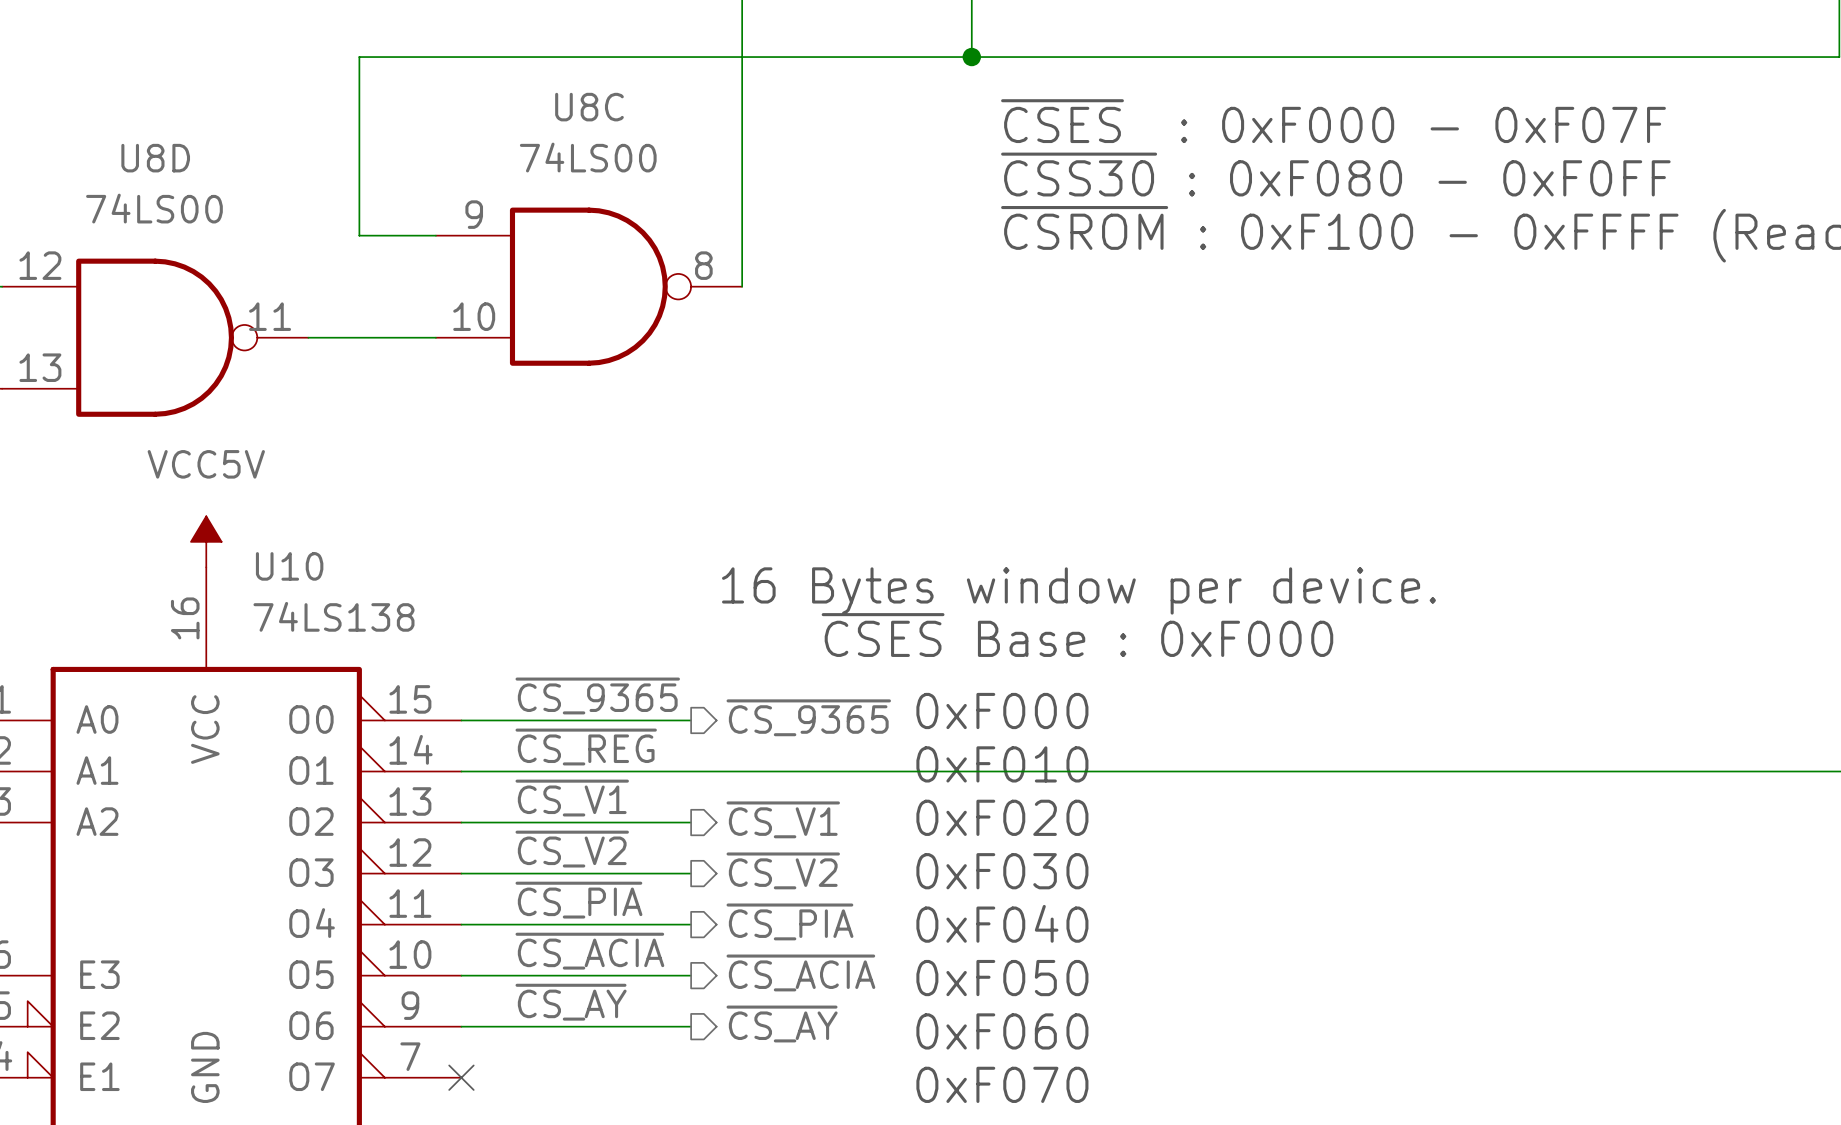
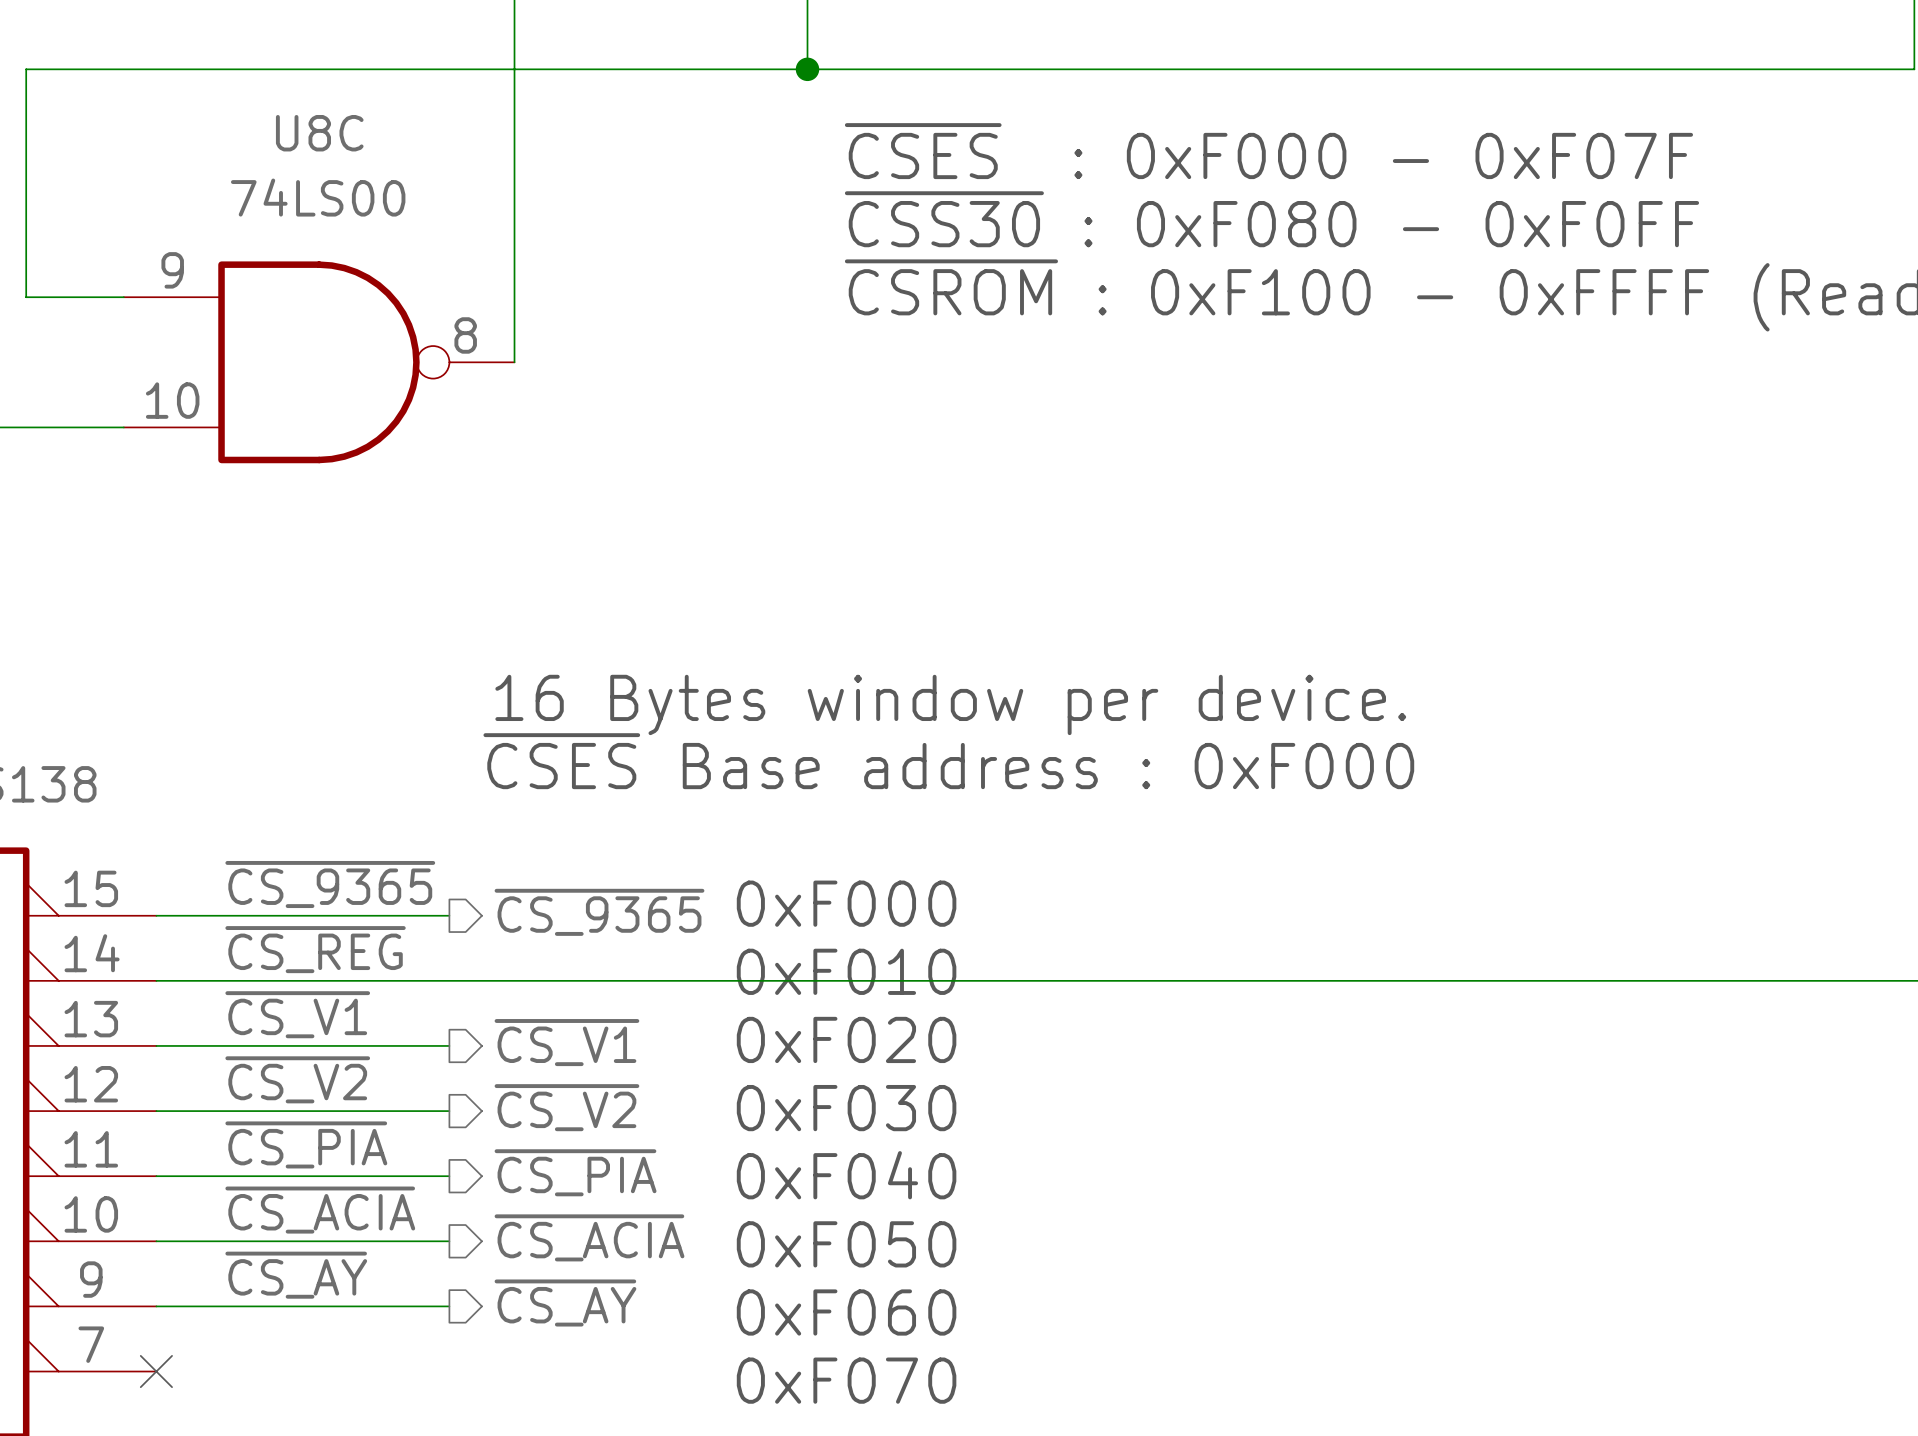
text position: 16 Bytes window per device. (1078, 590) -> 16 Bytes window per device. (950, 704)
text: ~{CSES} Base : 0xF000 (1077, 635) -> ~{CSES} Base address : 0xF000 (948, 761)

